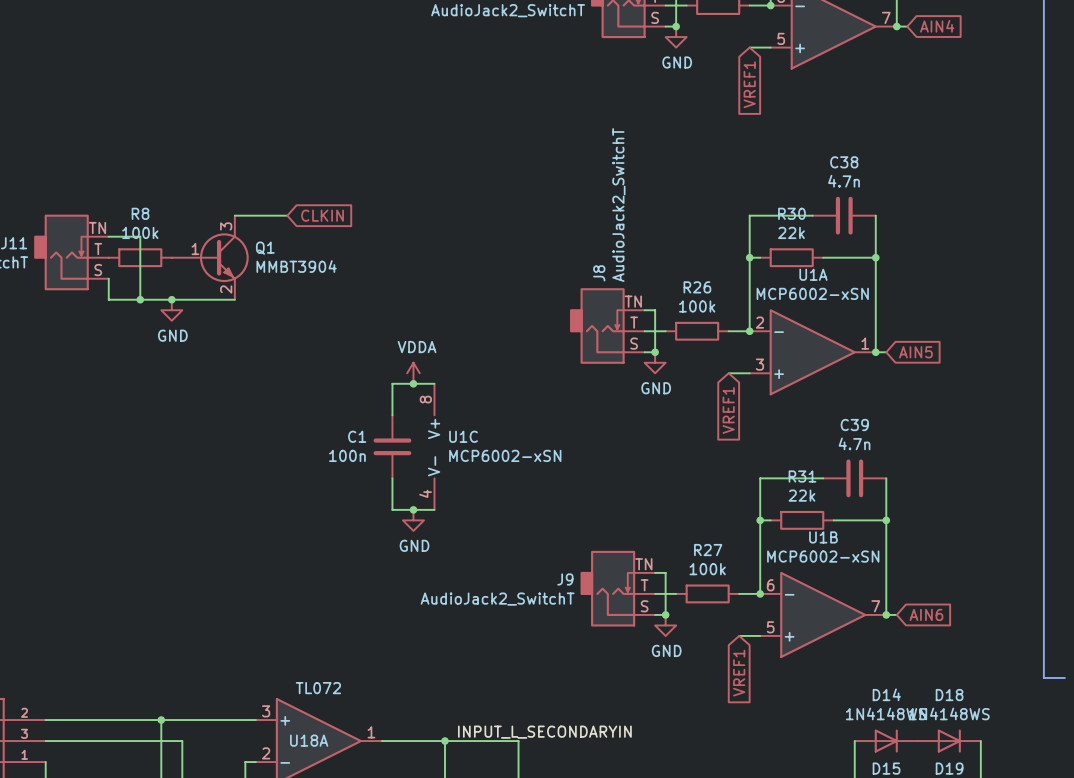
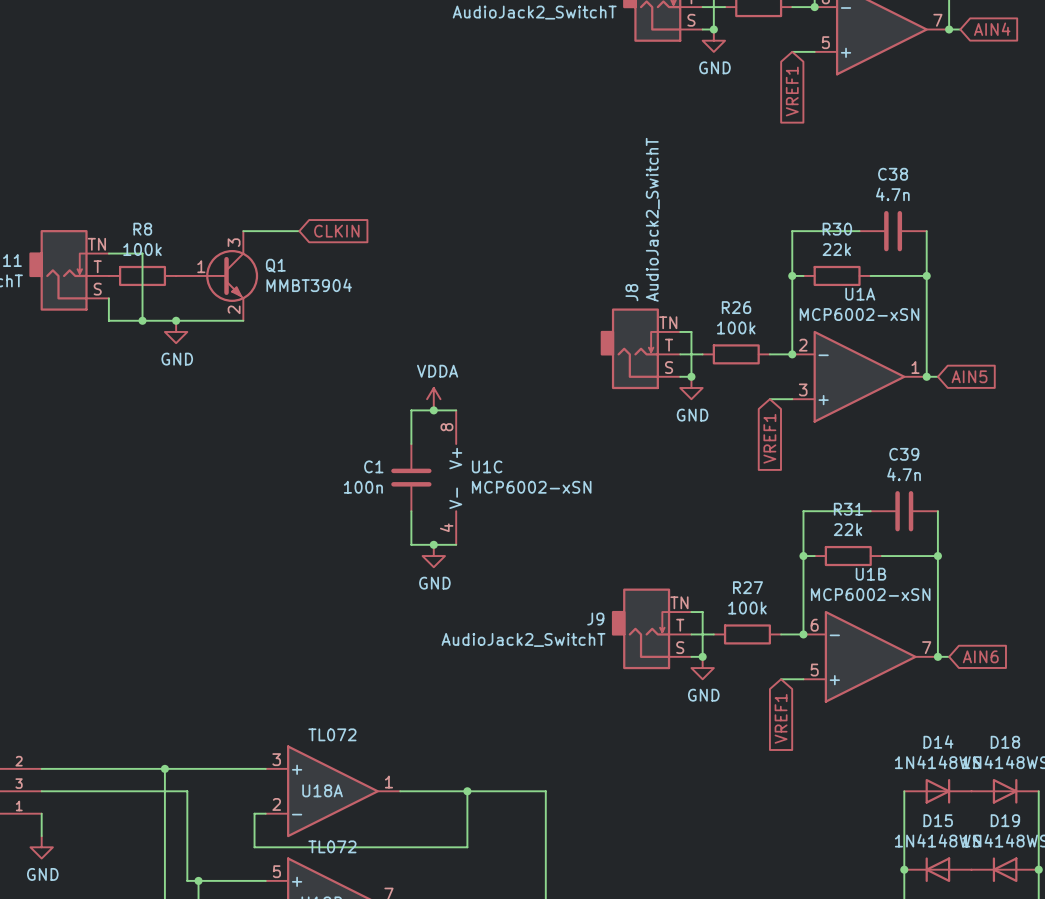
label: INPUT_L_SECONDARYIN (544, 732) -> none

